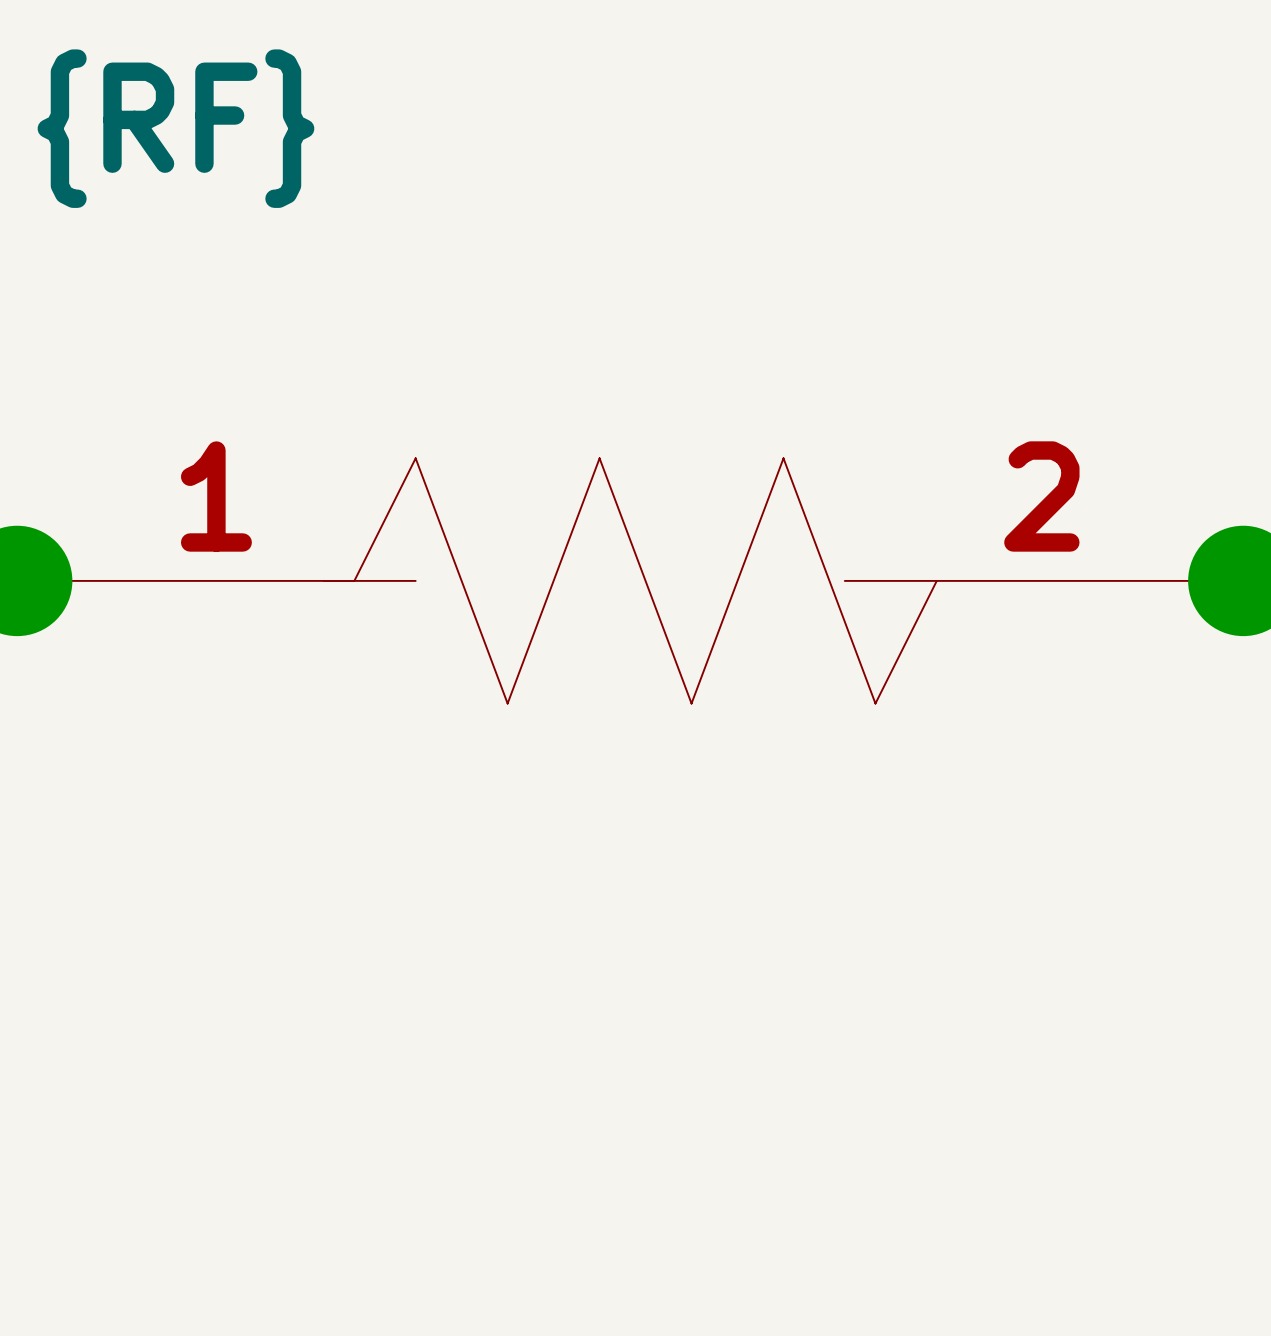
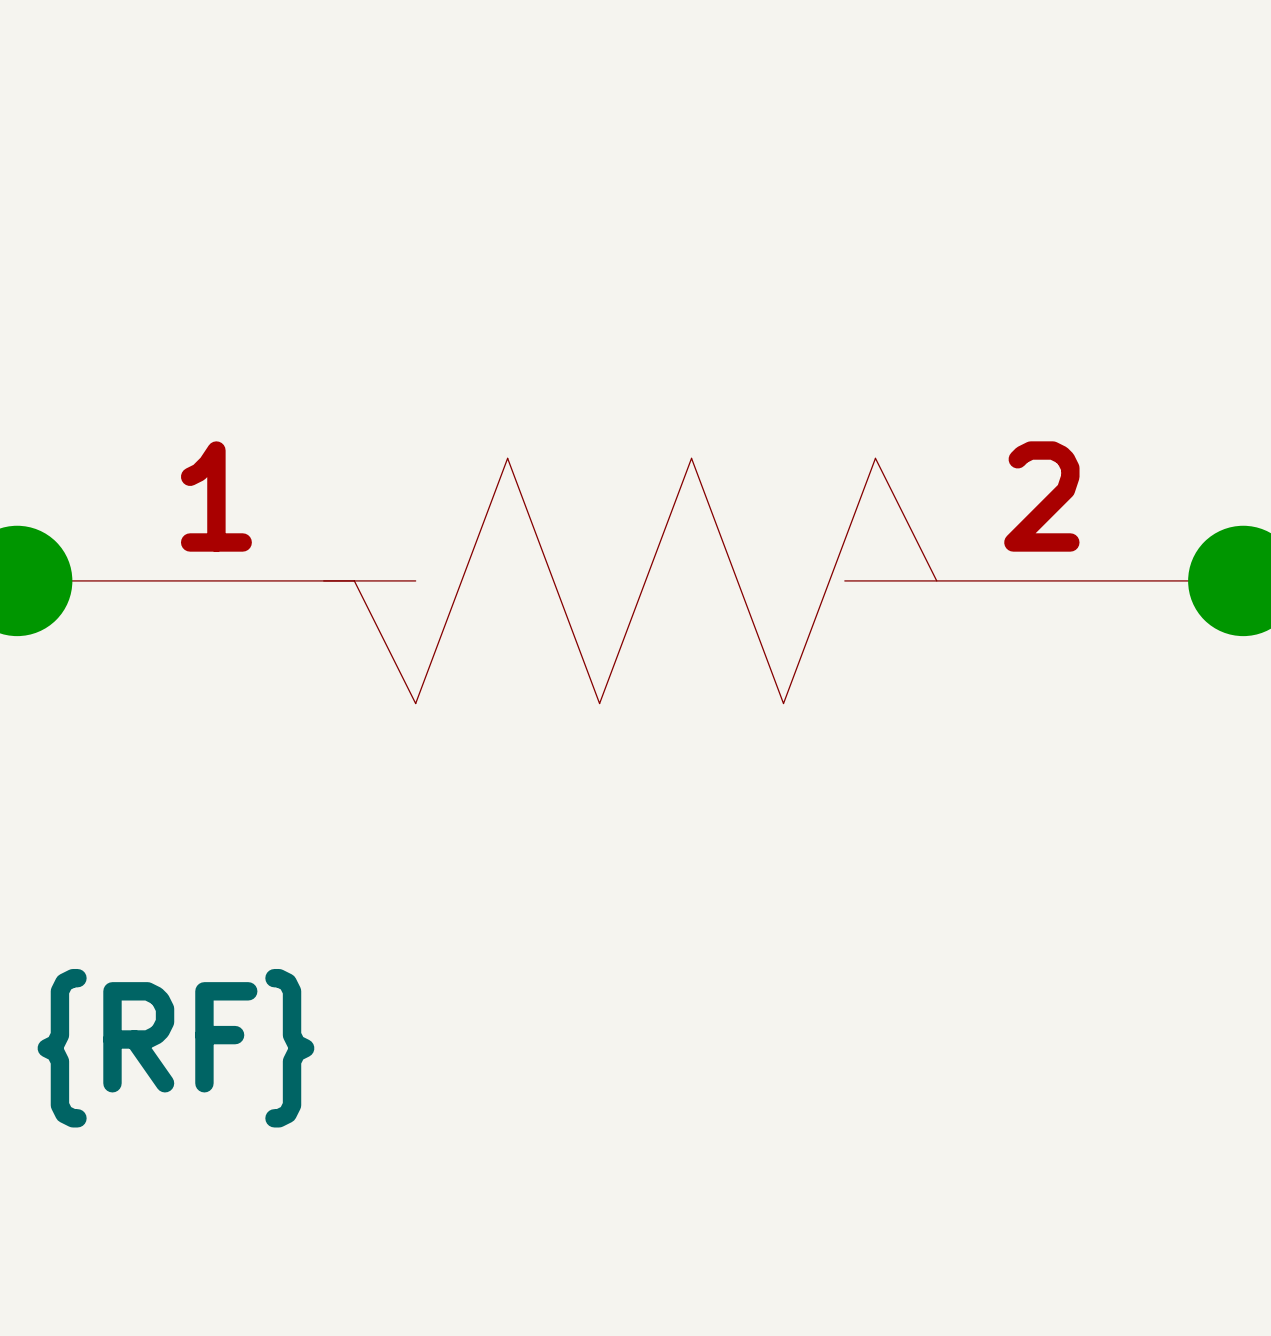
part flip: as is (630, 580) -> up-down (630, 580)

